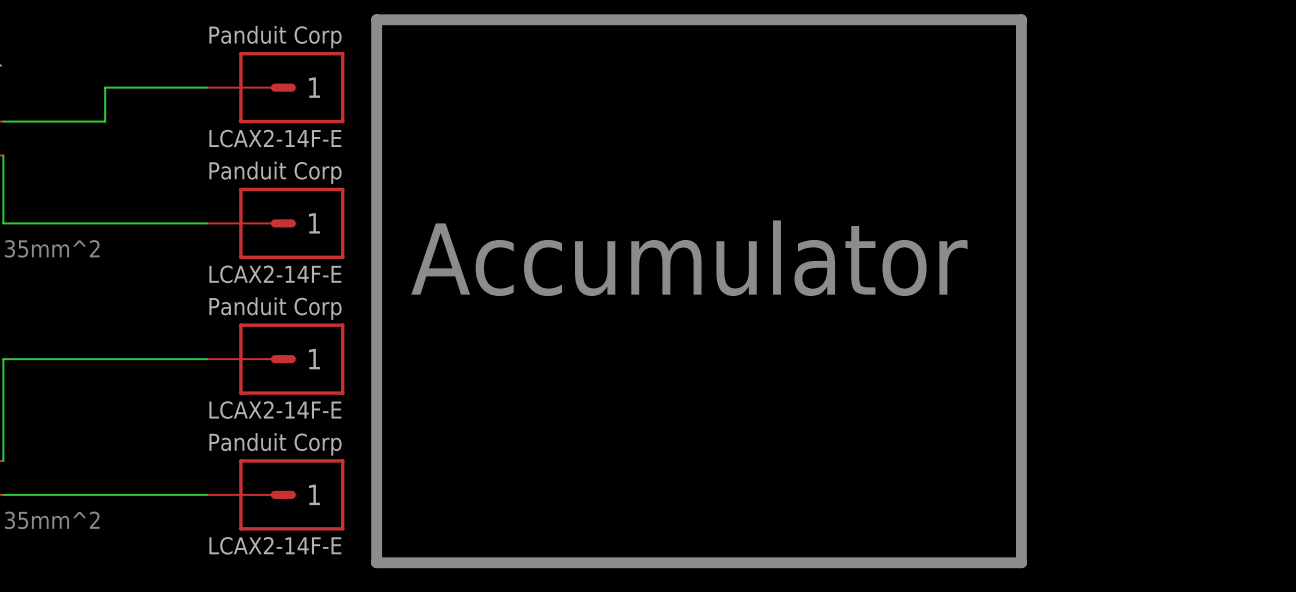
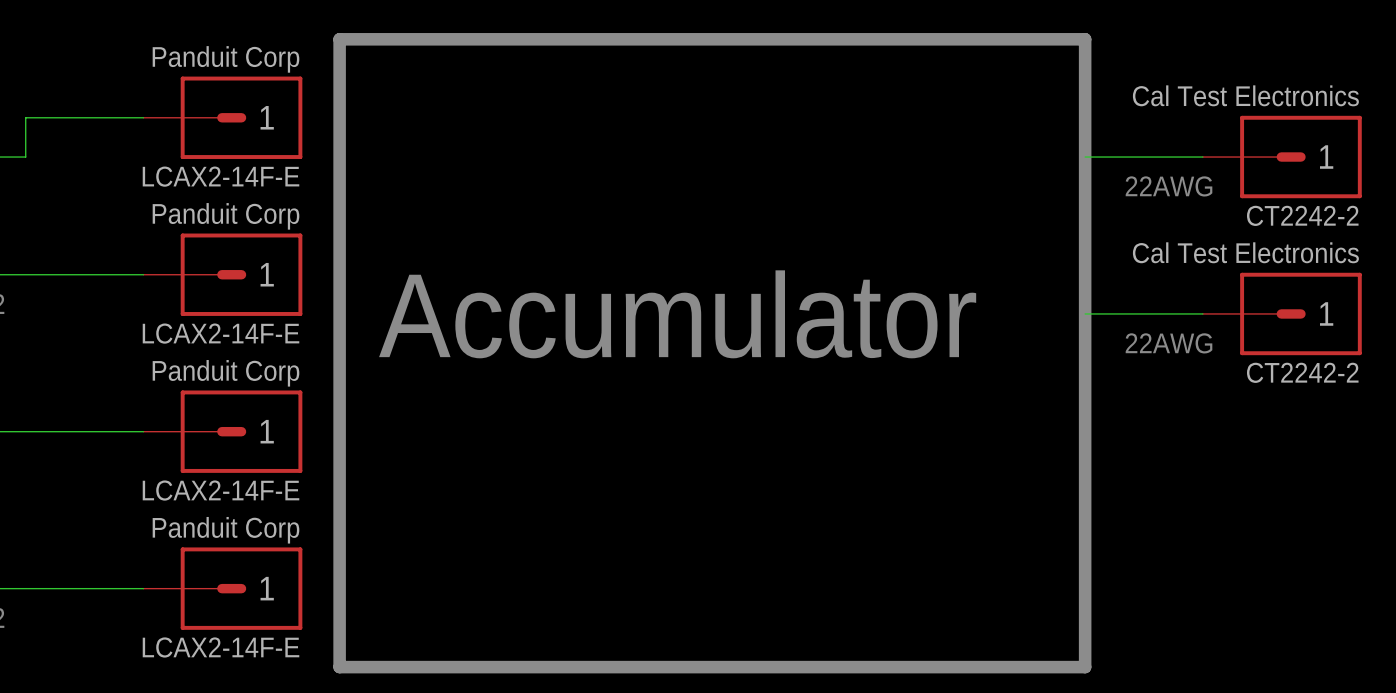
wire: none -> (1085, 157) (1202, 157)
part: none -> (1282, 157)
text: none -> 22AWG (1169, 186)
wire: none -> (1085, 313) (1202, 313)
part: none -> (1282, 313)
text: none -> 22AWG (1169, 343)

